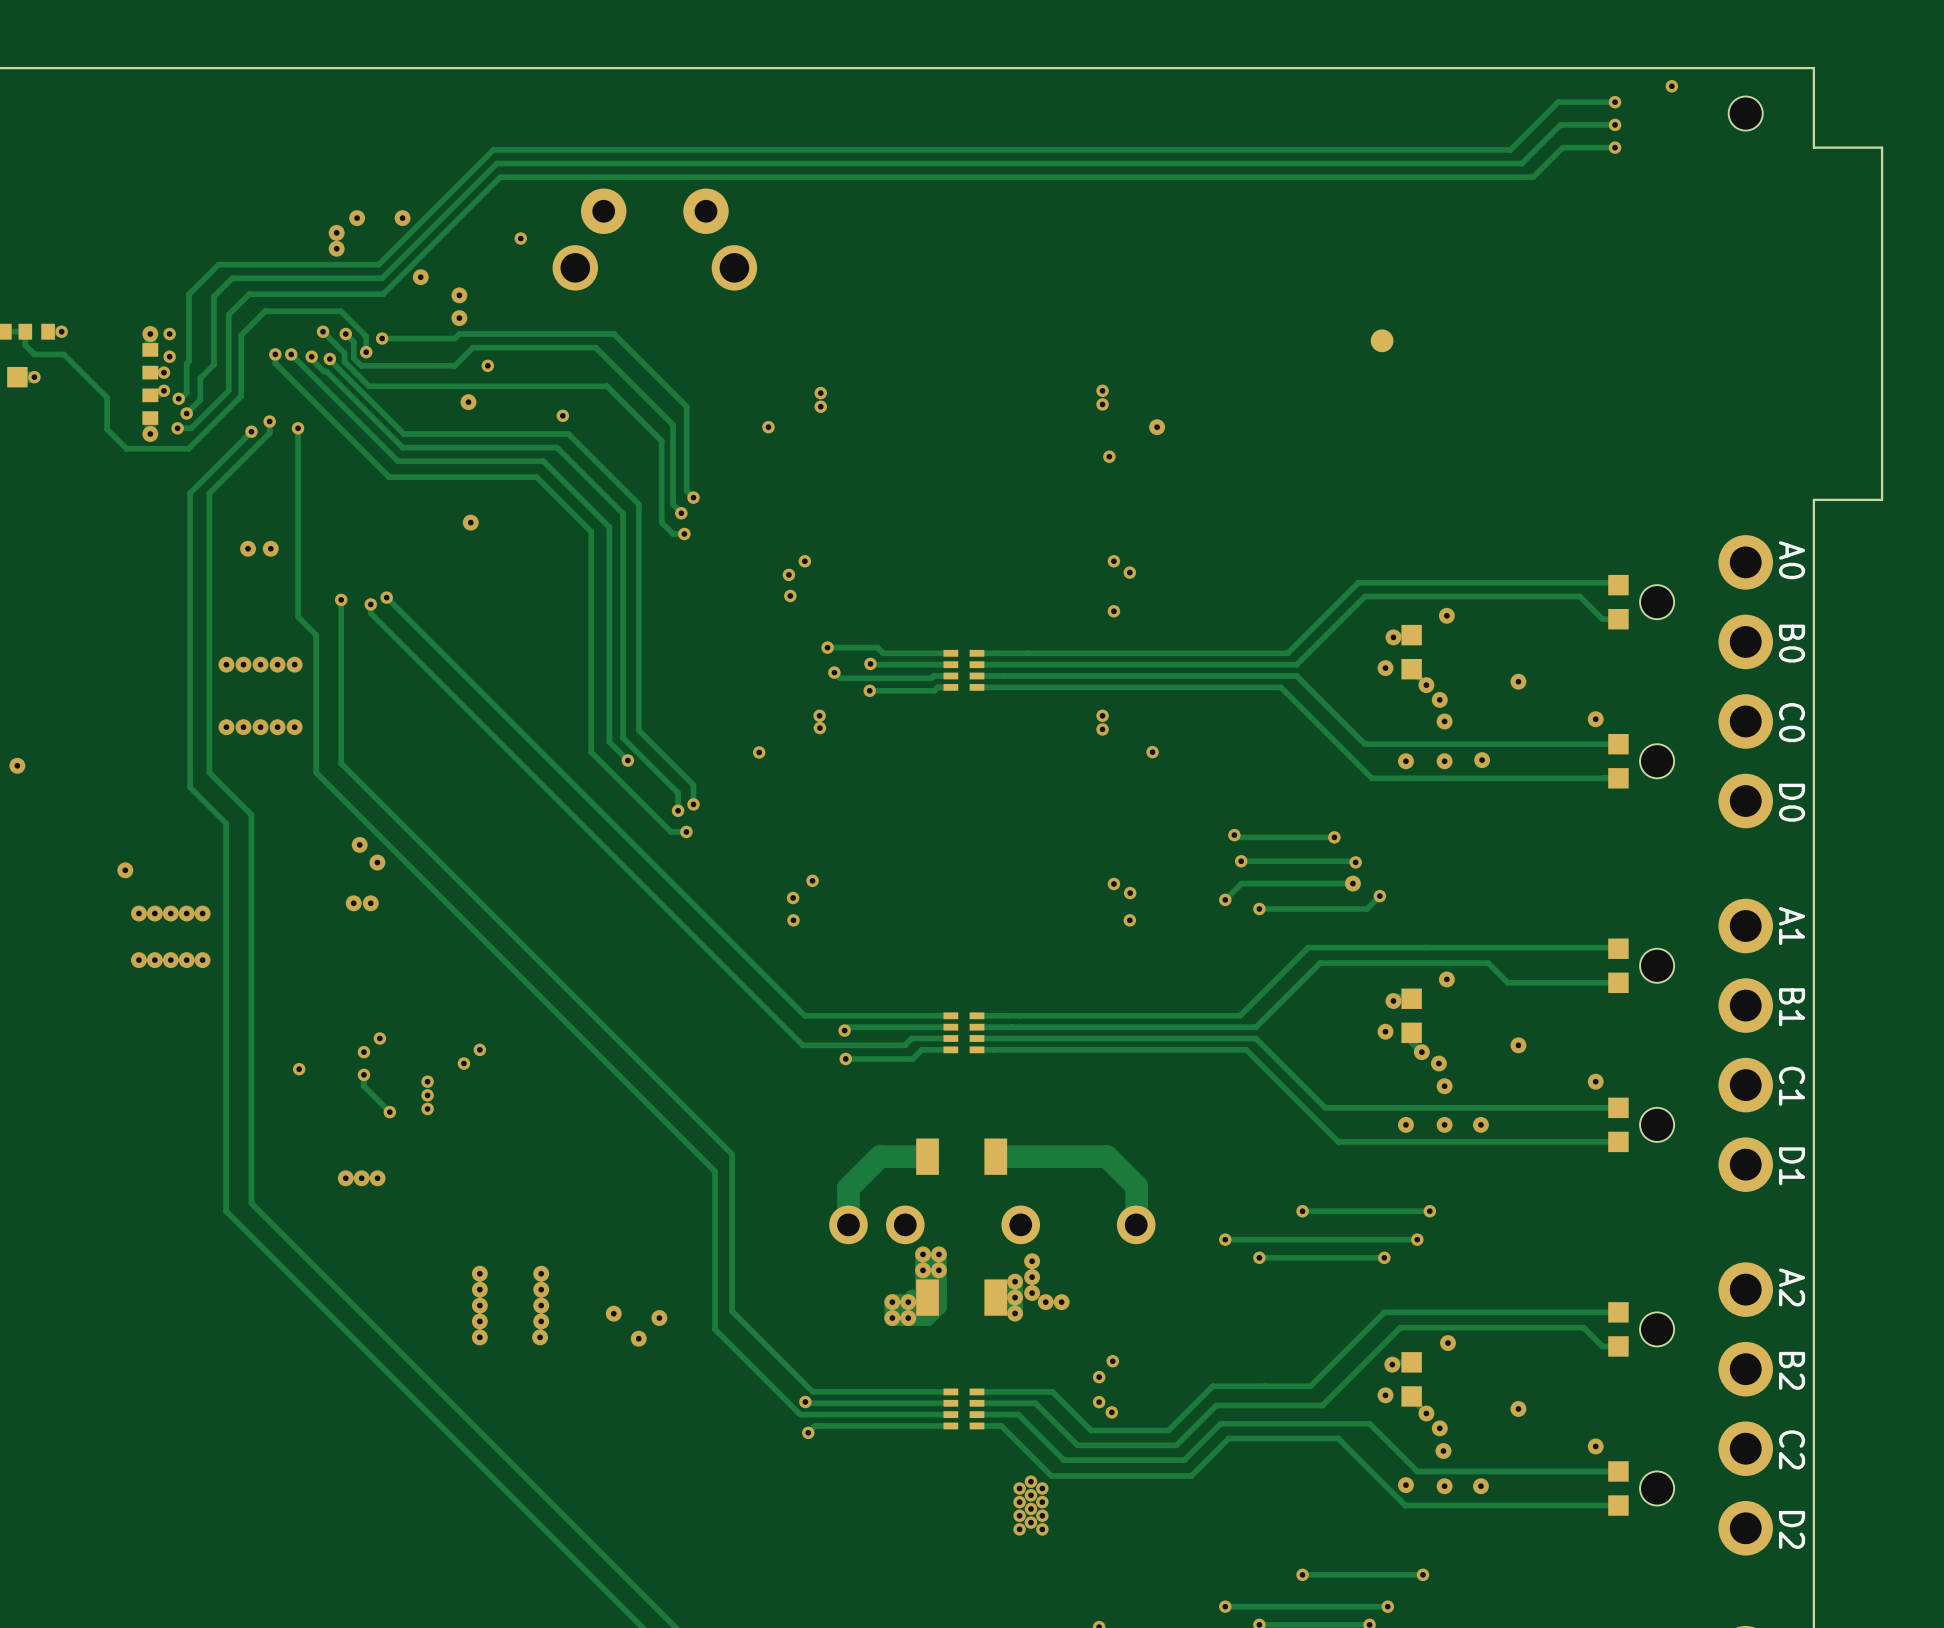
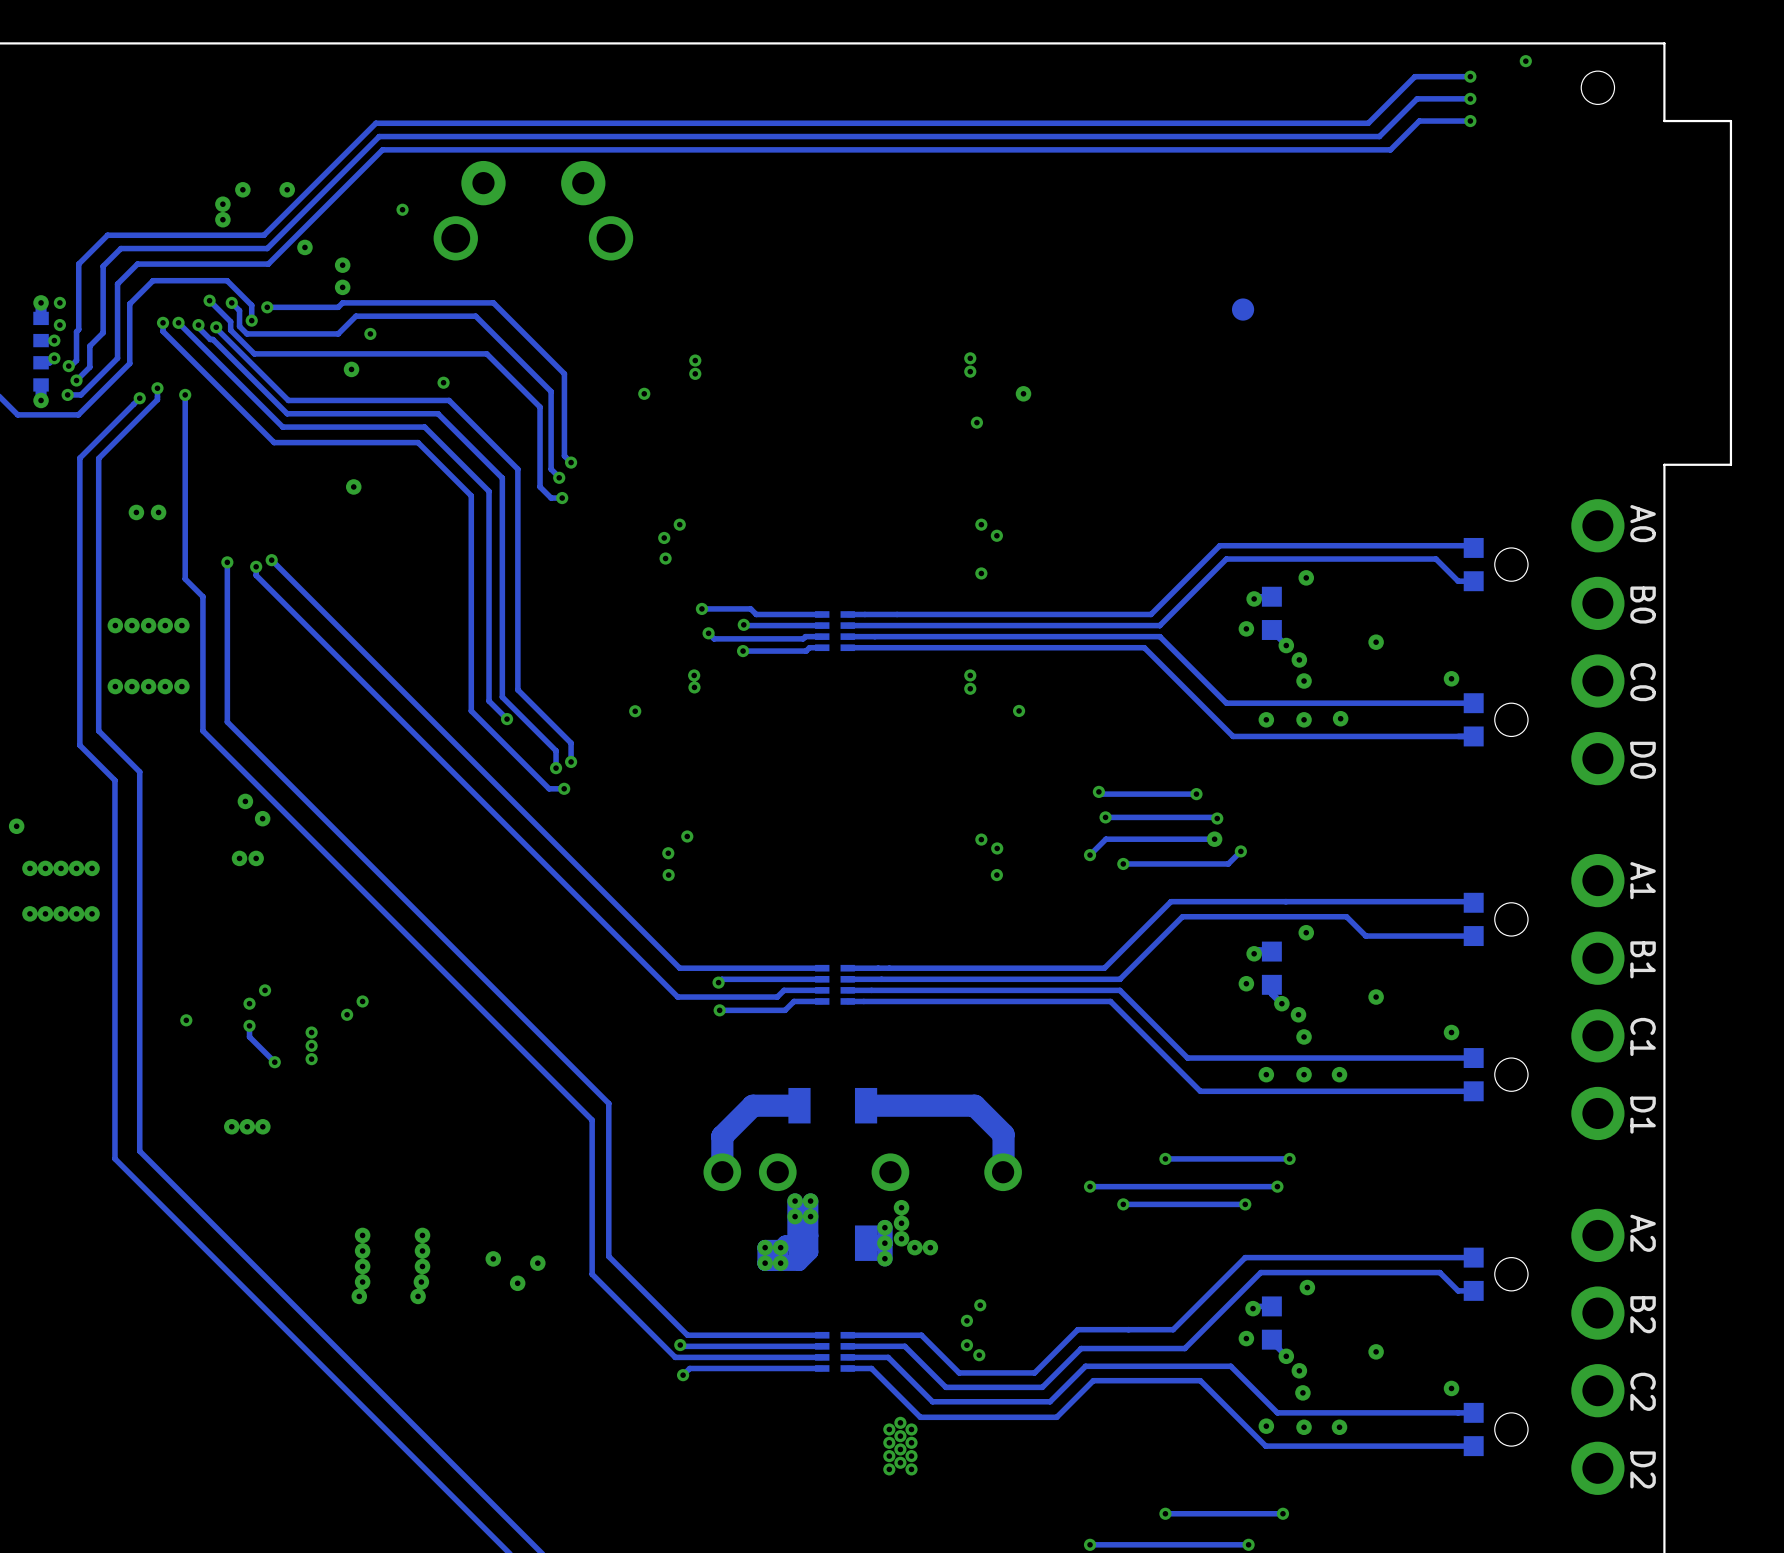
via: (479, 1273) -> none
via: (541, 1273) -> none
via: none -> (359, 1296)
via: none -> (418, 1296)

